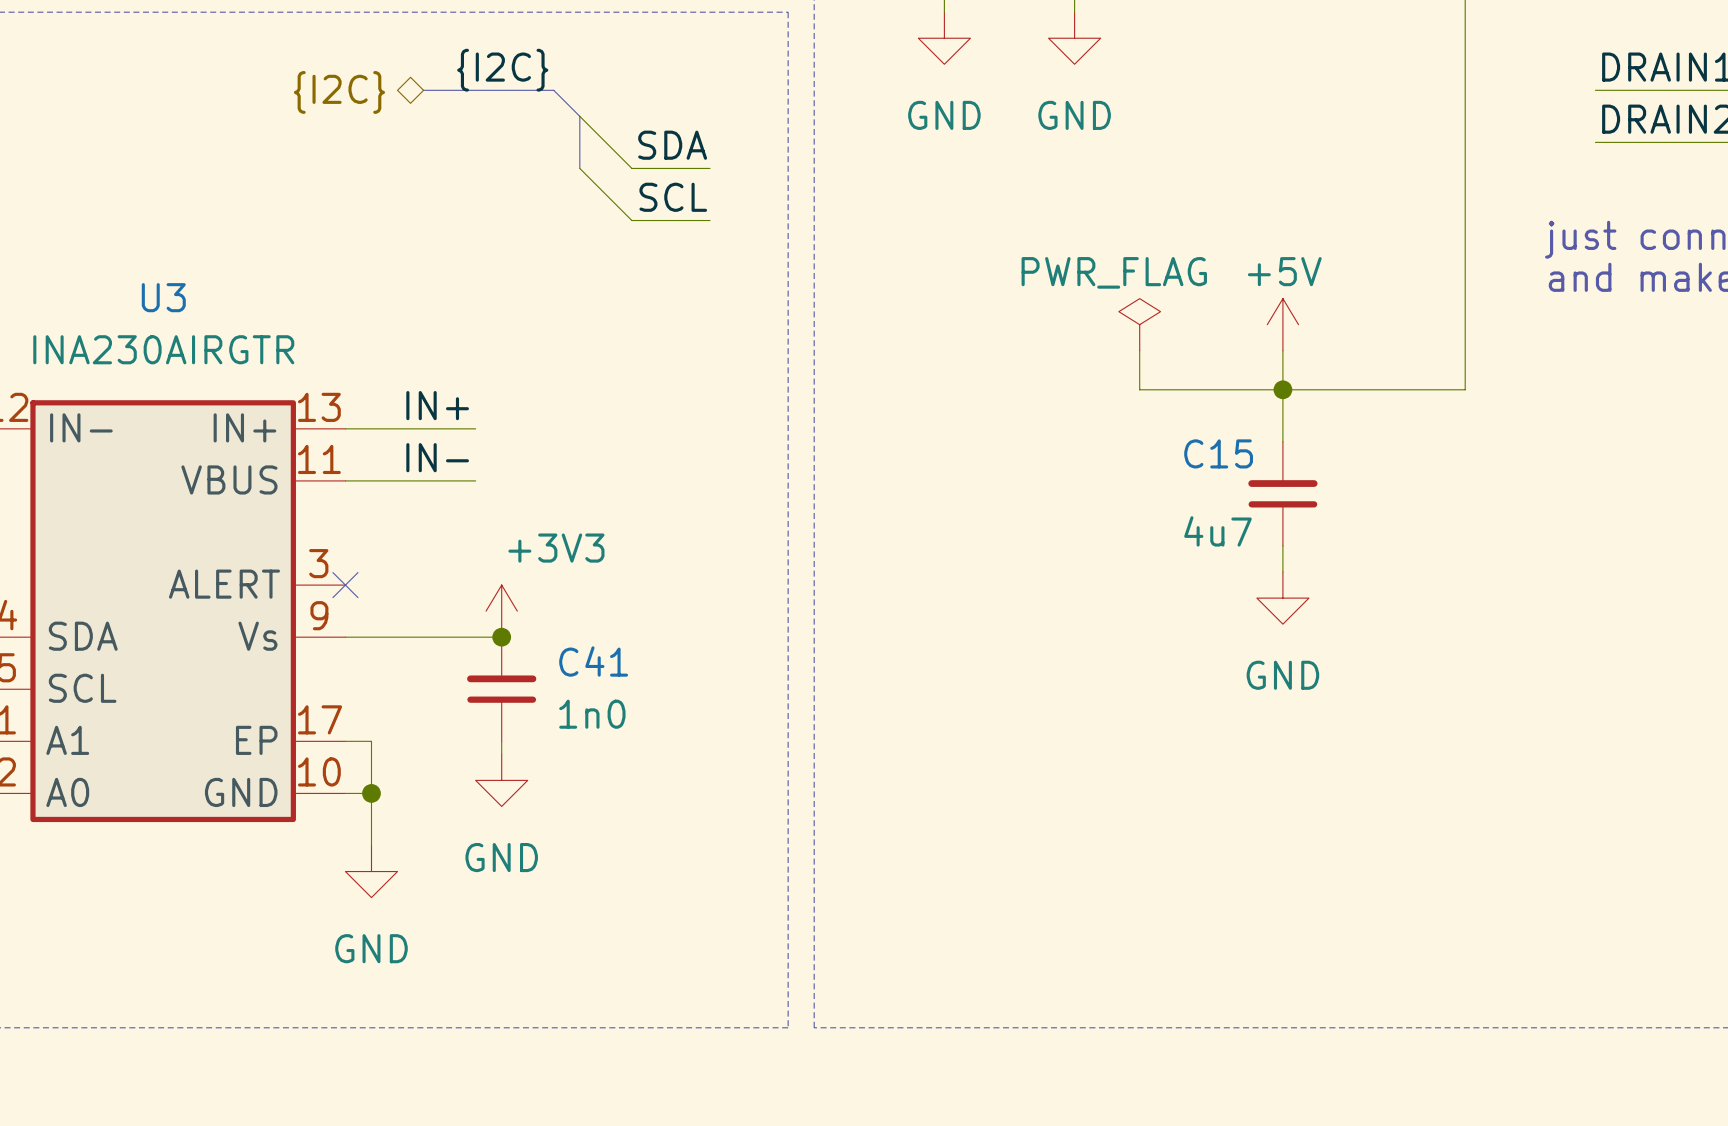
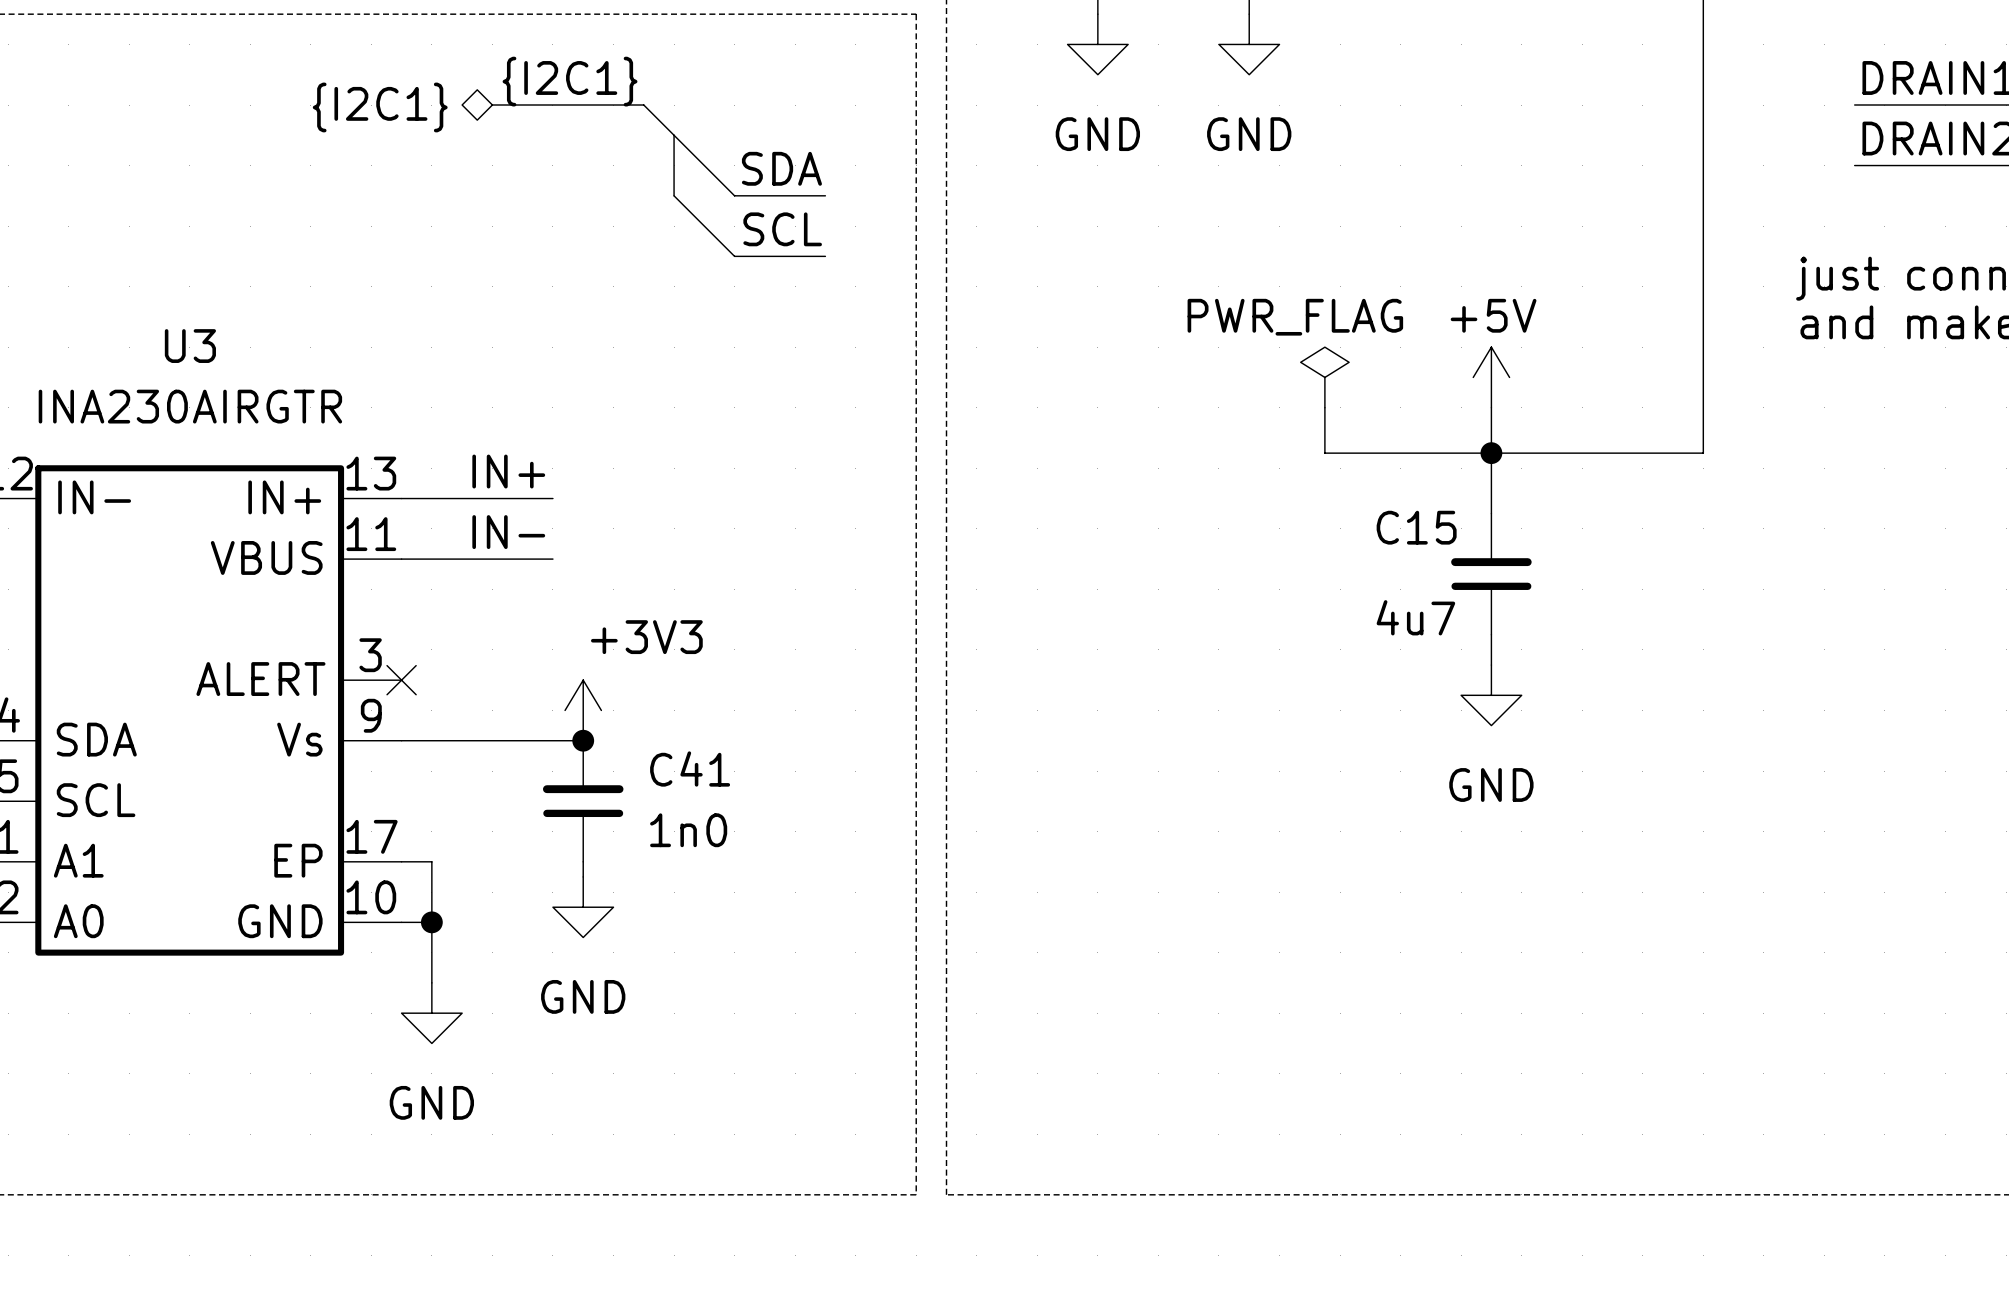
label: {I2C} (502, 70) -> {I2C1} (570, 81)
hierarchical label: {I2C} (339, 92) -> {I2C1} (380, 107)

